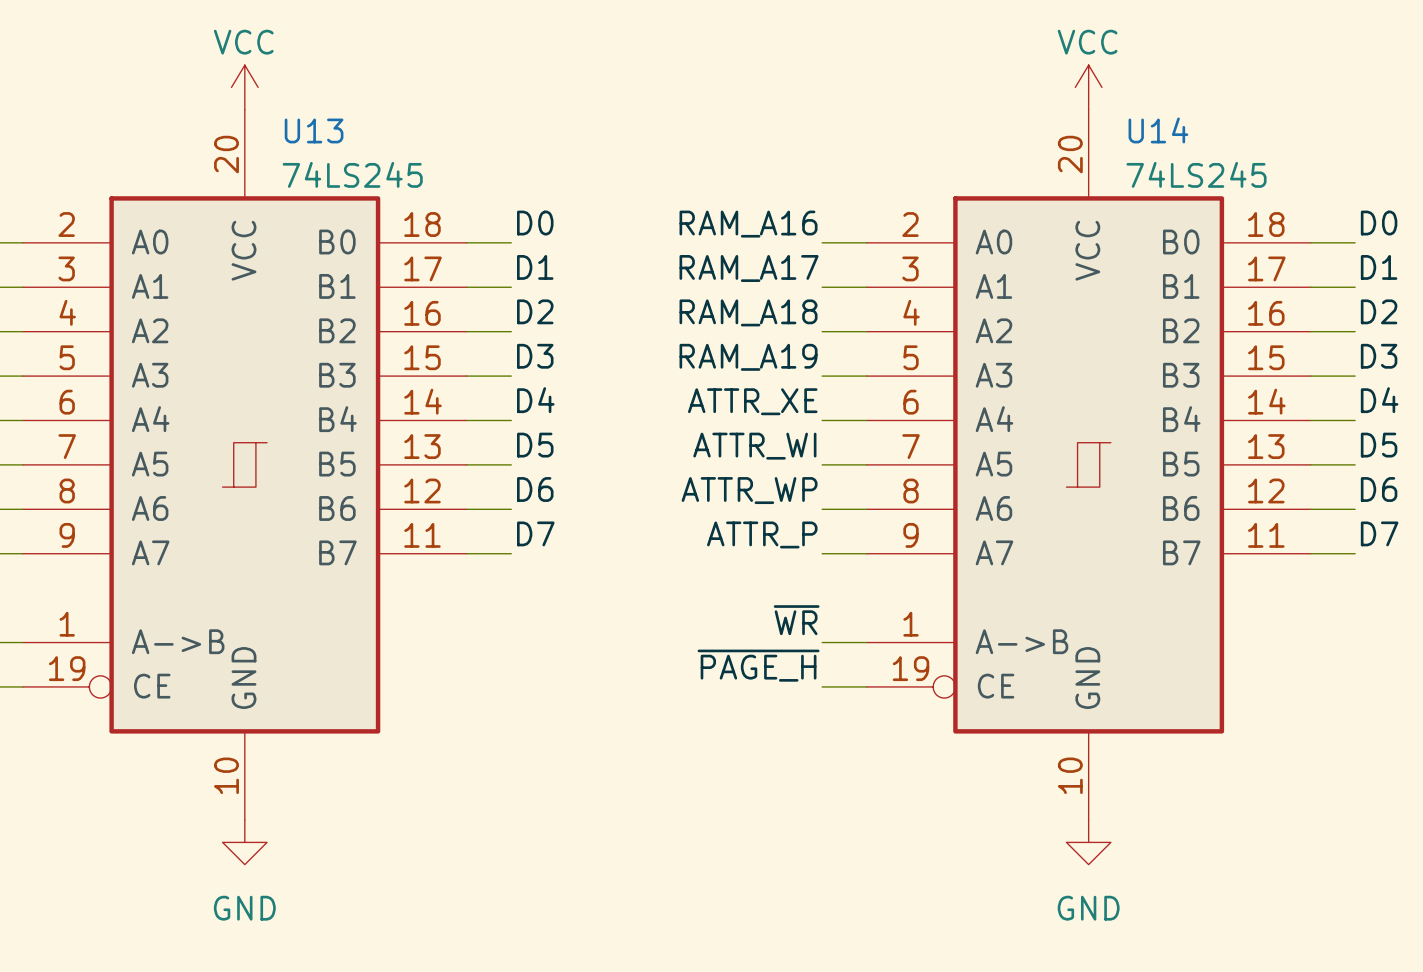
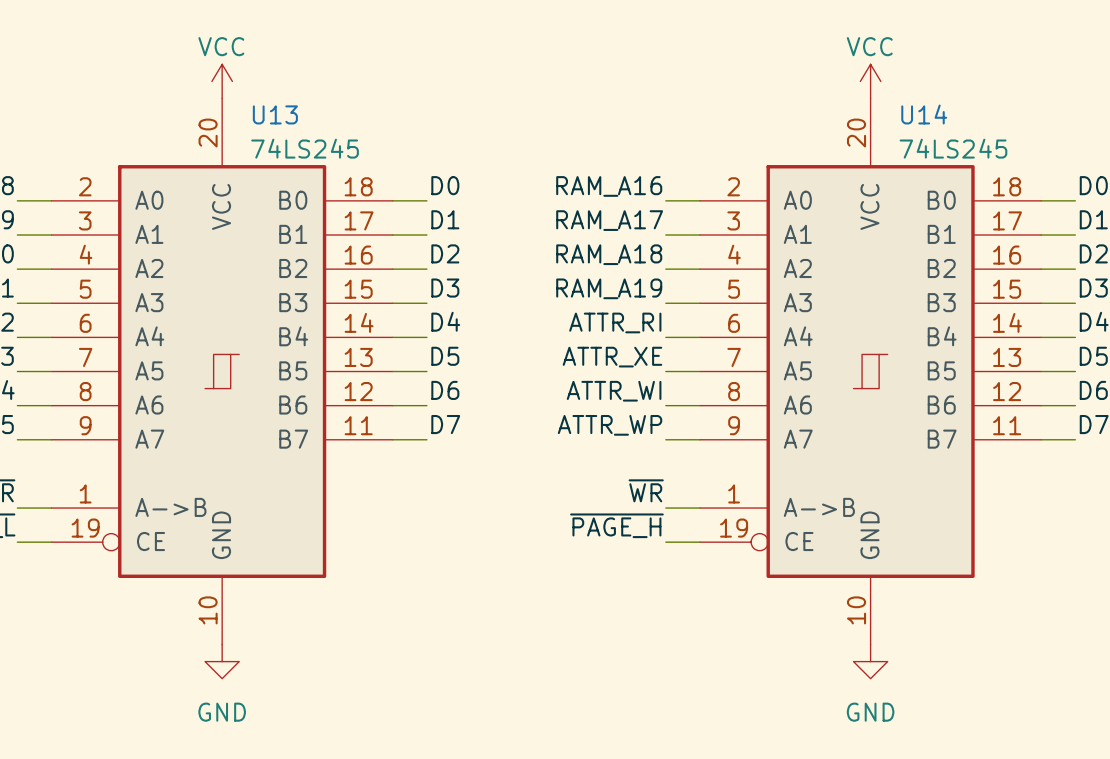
label: ATTR_XE (752, 401) -> ATTR_RI (615, 322)
label: ATTR_WI (754, 446) -> ATTR_XE (612, 357)
label: ATTR_WP (749, 490) -> ATTR_WI (614, 391)
label: ATTR_P (762, 534) -> ATTR_WP (610, 425)

